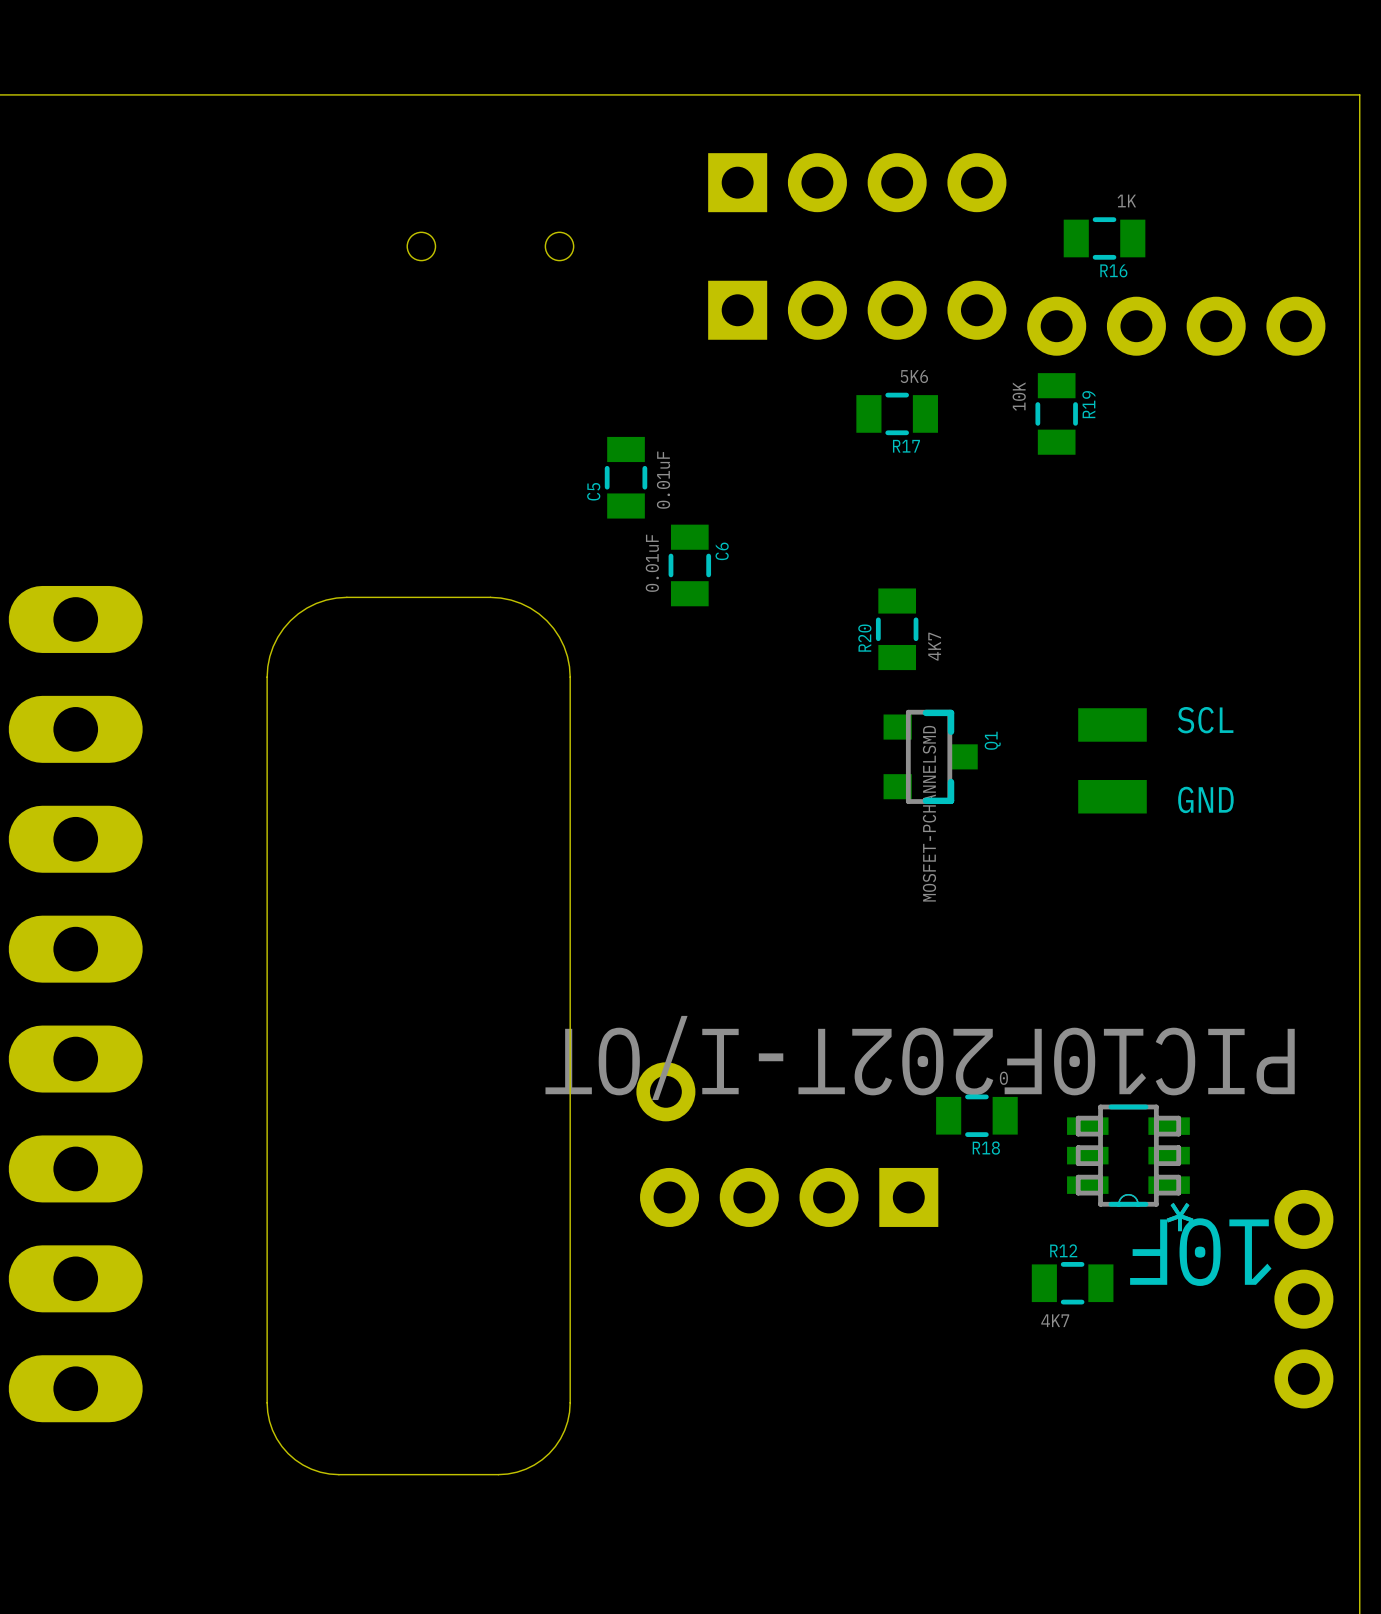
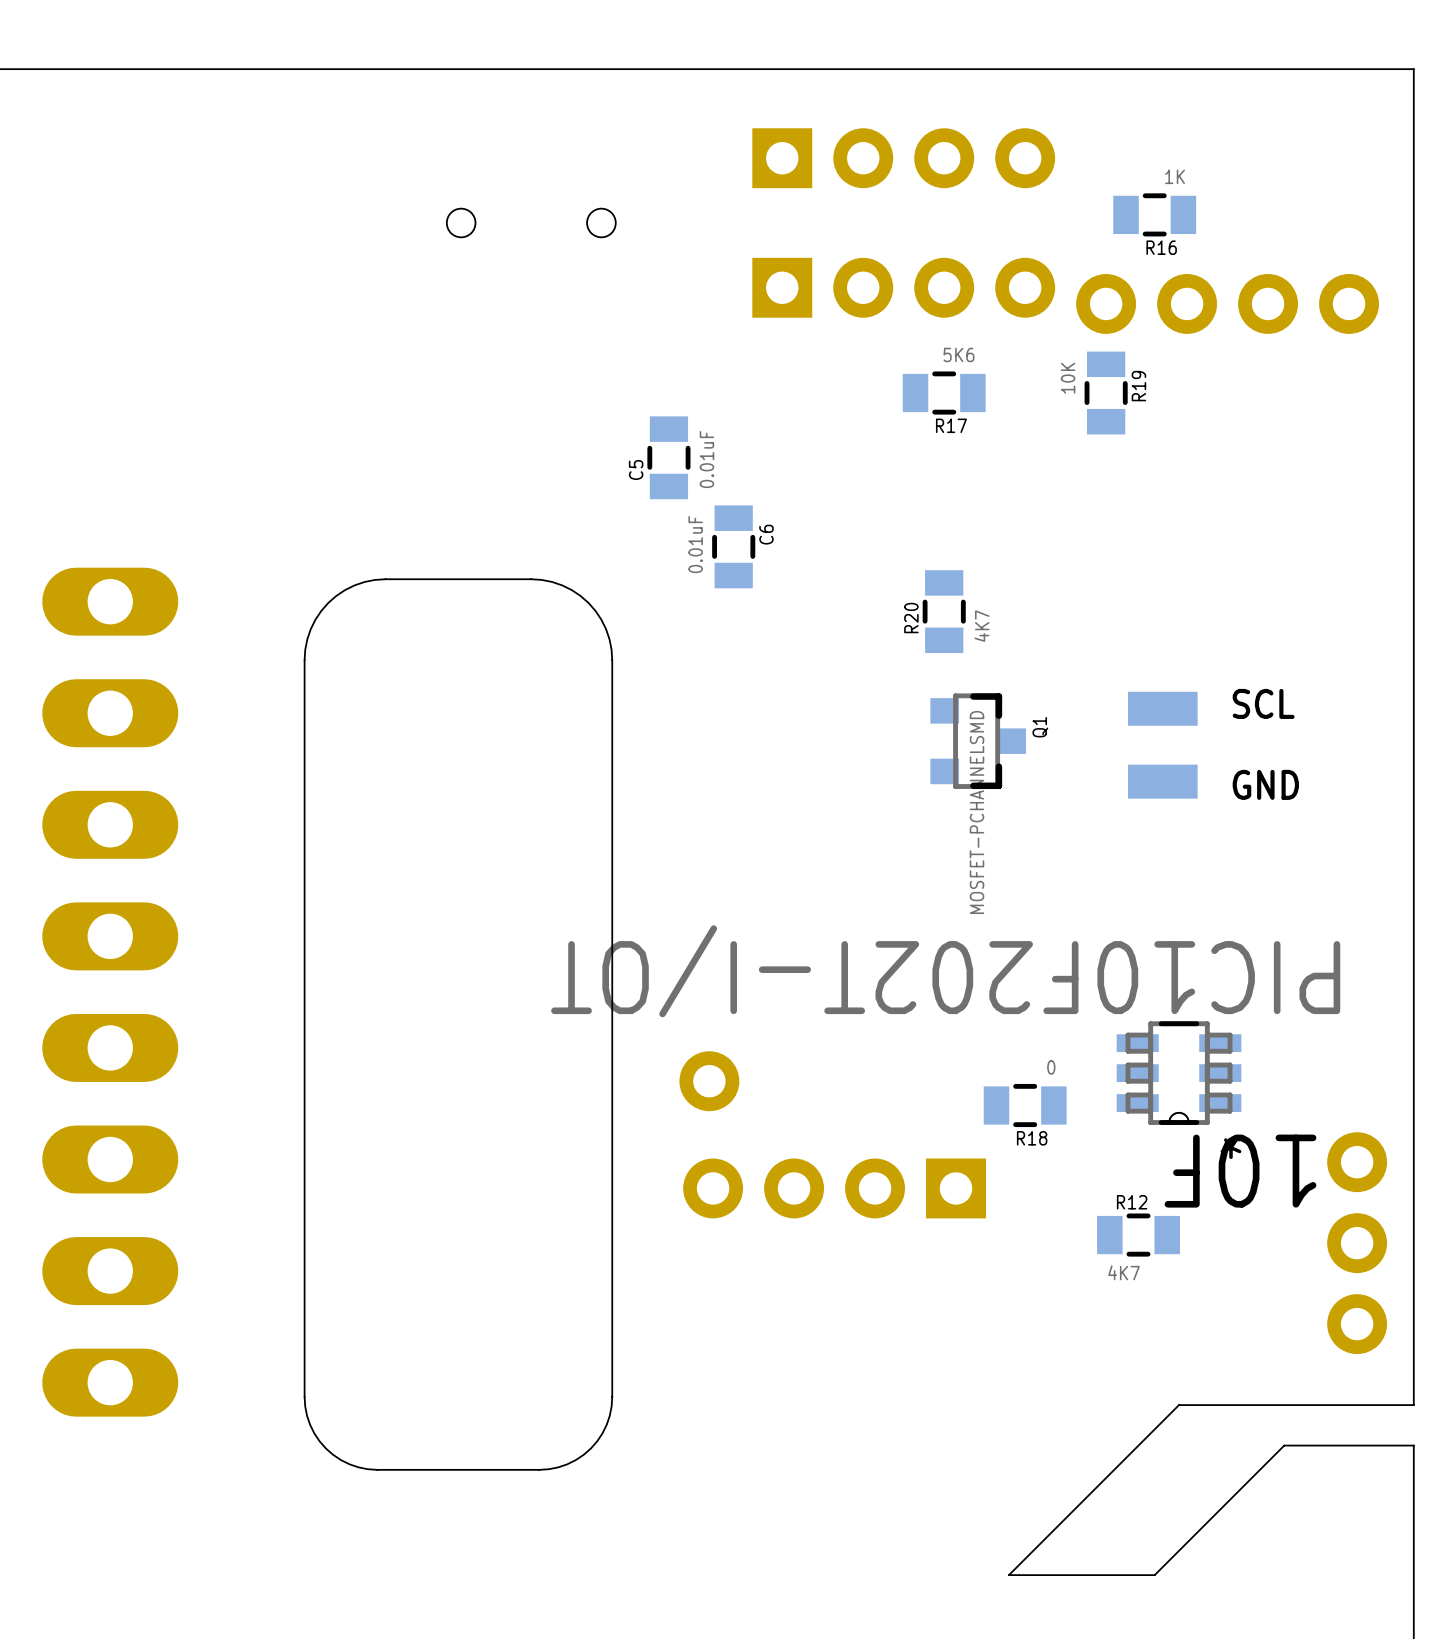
10F position: (1128, 1155) -> (1179, 1073)
R12 position: (1072, 1283) -> (1138, 1235)
part position: (1303, 1299) -> (1357, 1243)
board edge: (1359, 1410) (1359, 1450) -> (1413, 1405) (1179, 1405) (1008, 1575) (1154, 1575) (1284, 1445) (1413, 1445)

